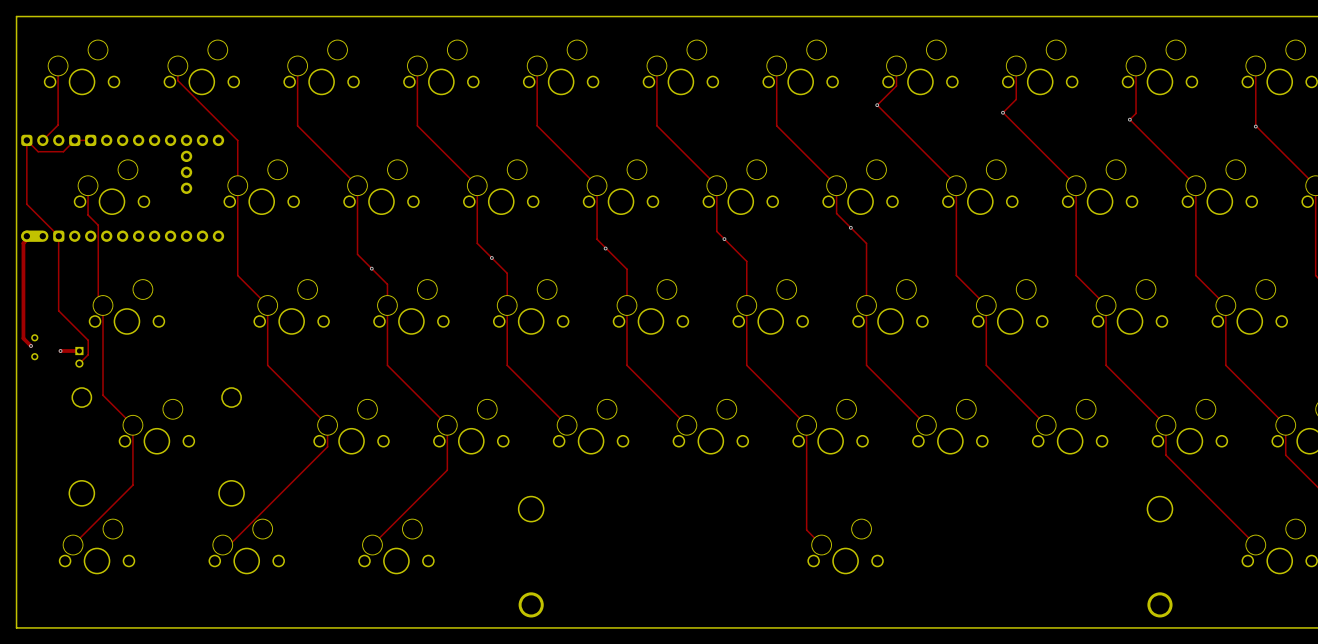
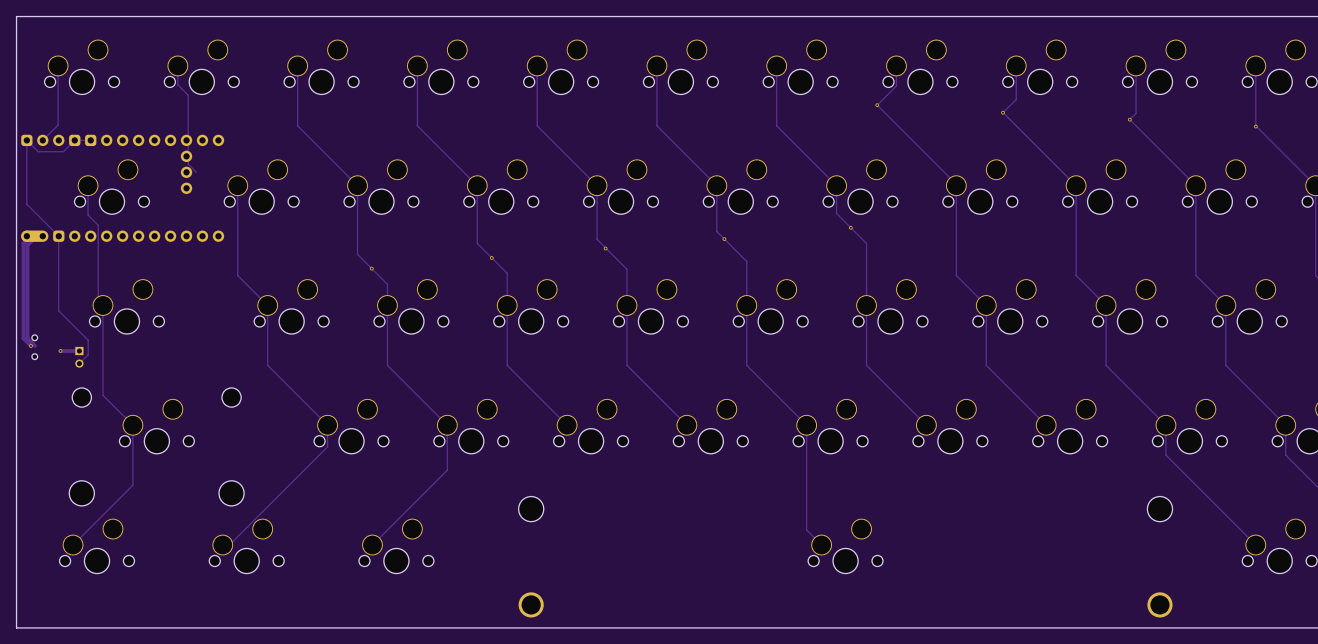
track: (177, 80) (237, 140) (237, 185) -> (177, 80) (177, 84) (188, 95) (188, 164) (196, 172)
track: none -> (36, 236) (27, 245) (27, 338) (35, 345)

